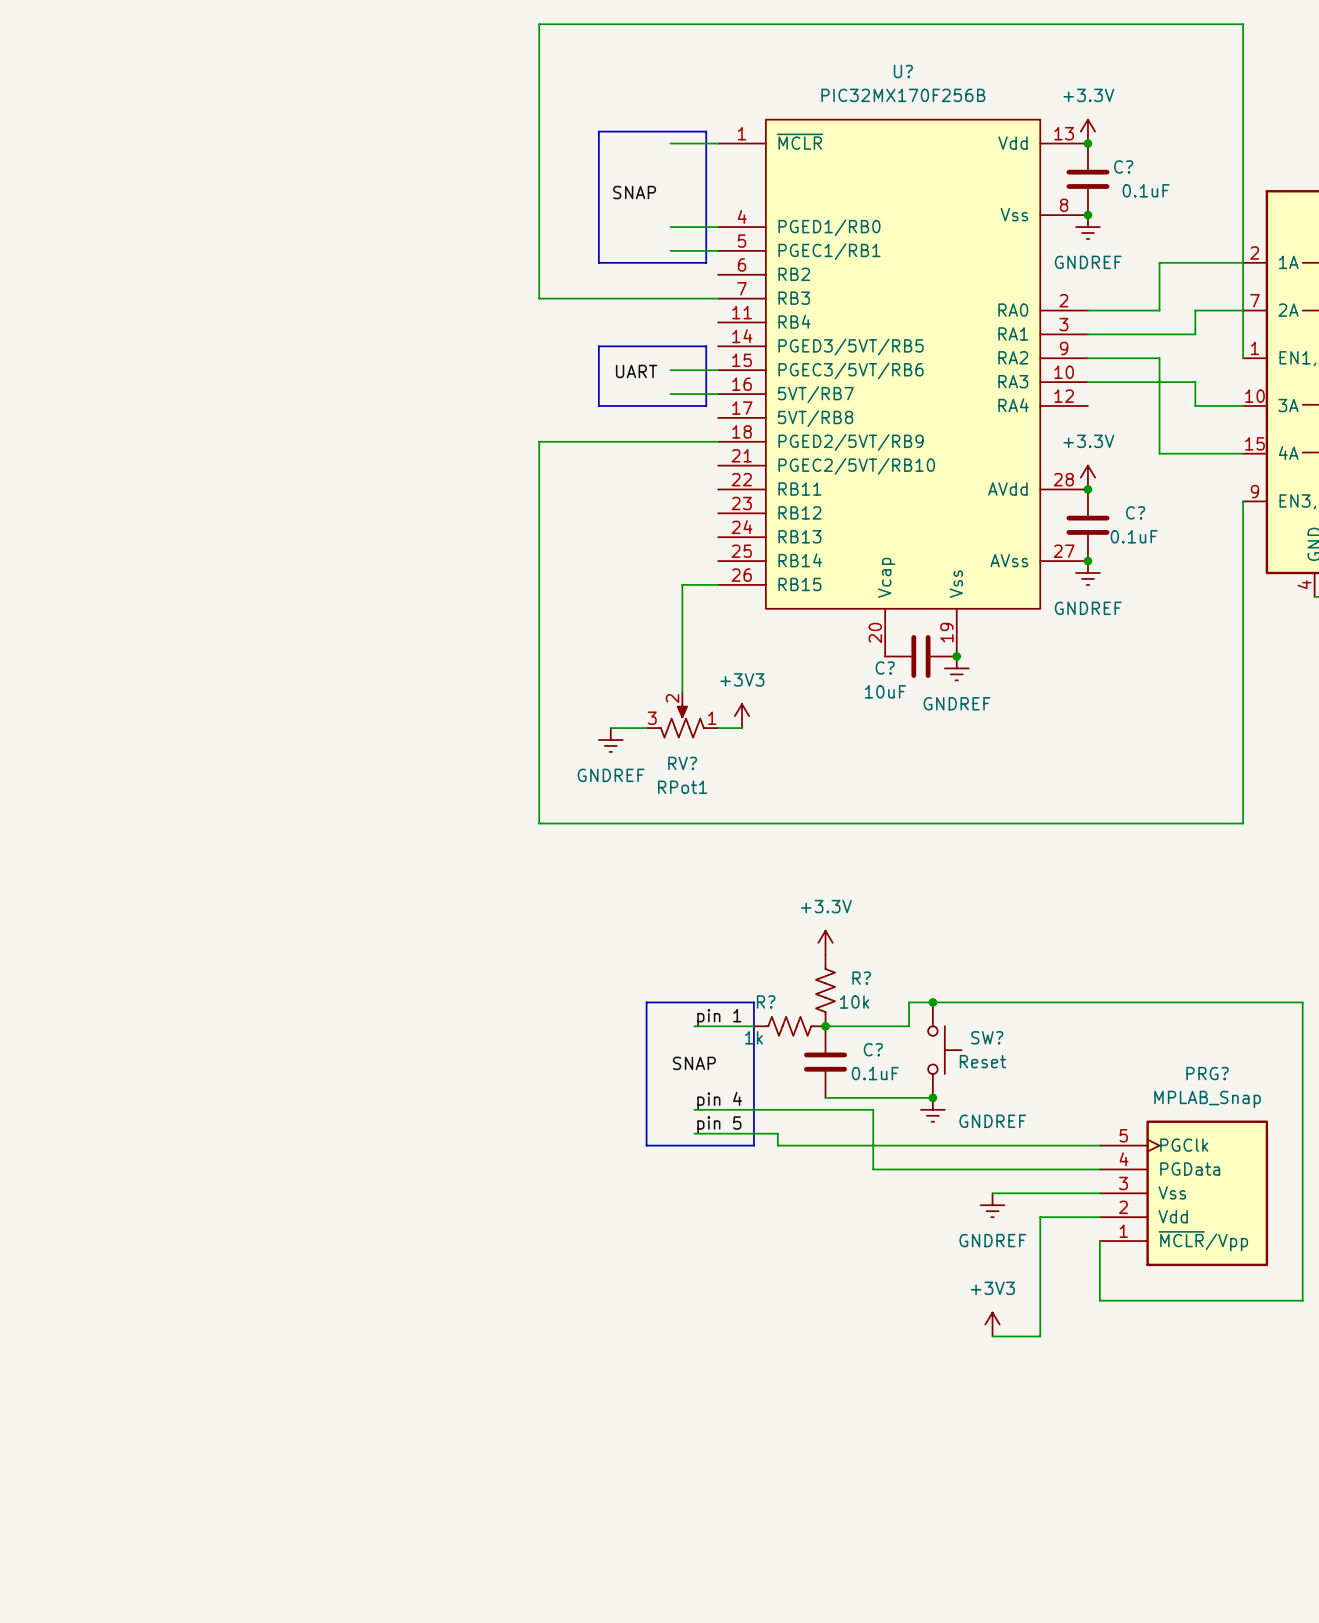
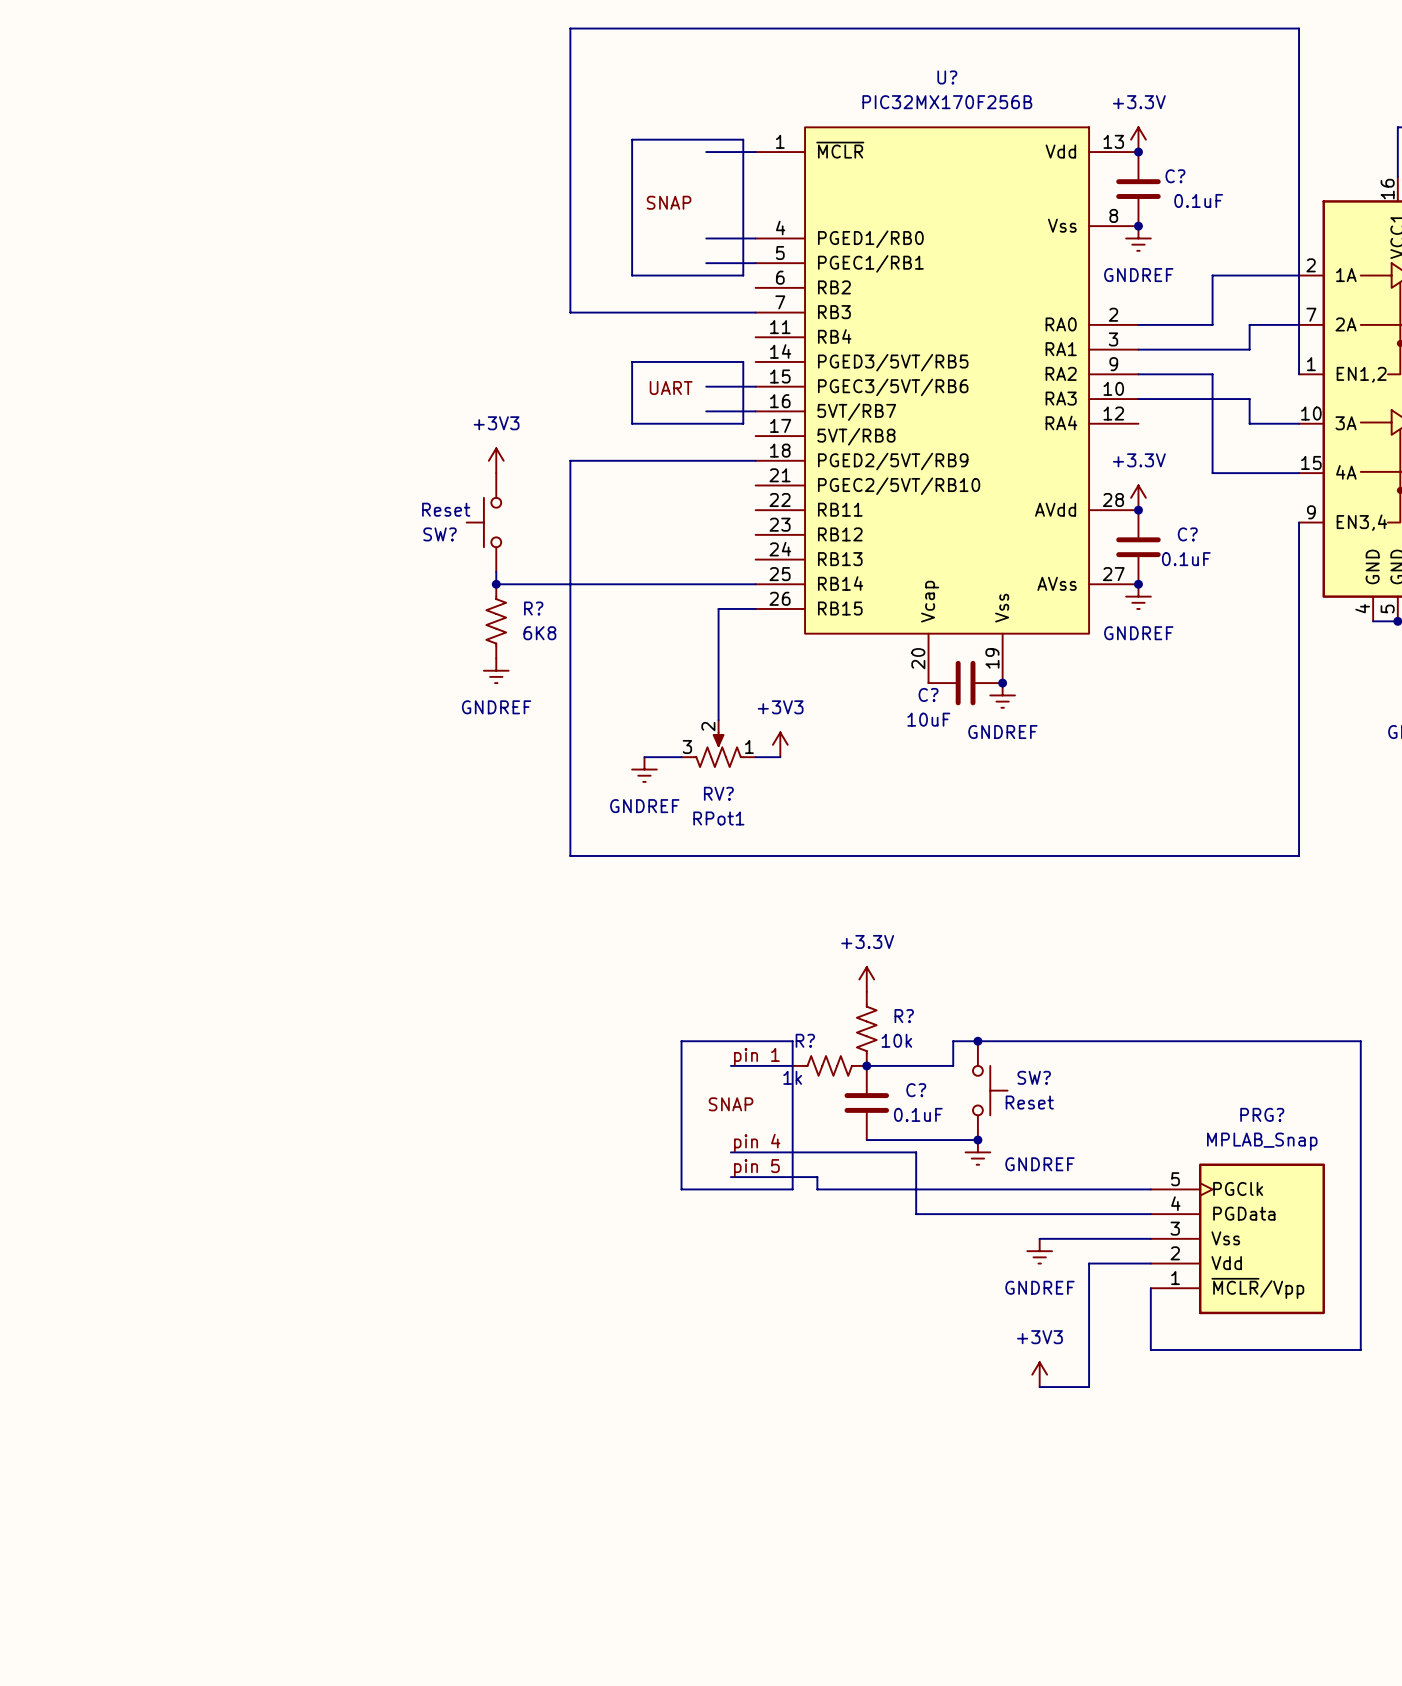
power symbol: none -> +3V3 (496, 460)
SW?: none -> Reset (483, 522)
wire: none -> (496, 571) (496, 584) (755, 584)
junction: none -> (496, 584)
R?: none -> 6K8 (496, 621)
power symbol: none -> GNDREF (496, 670)

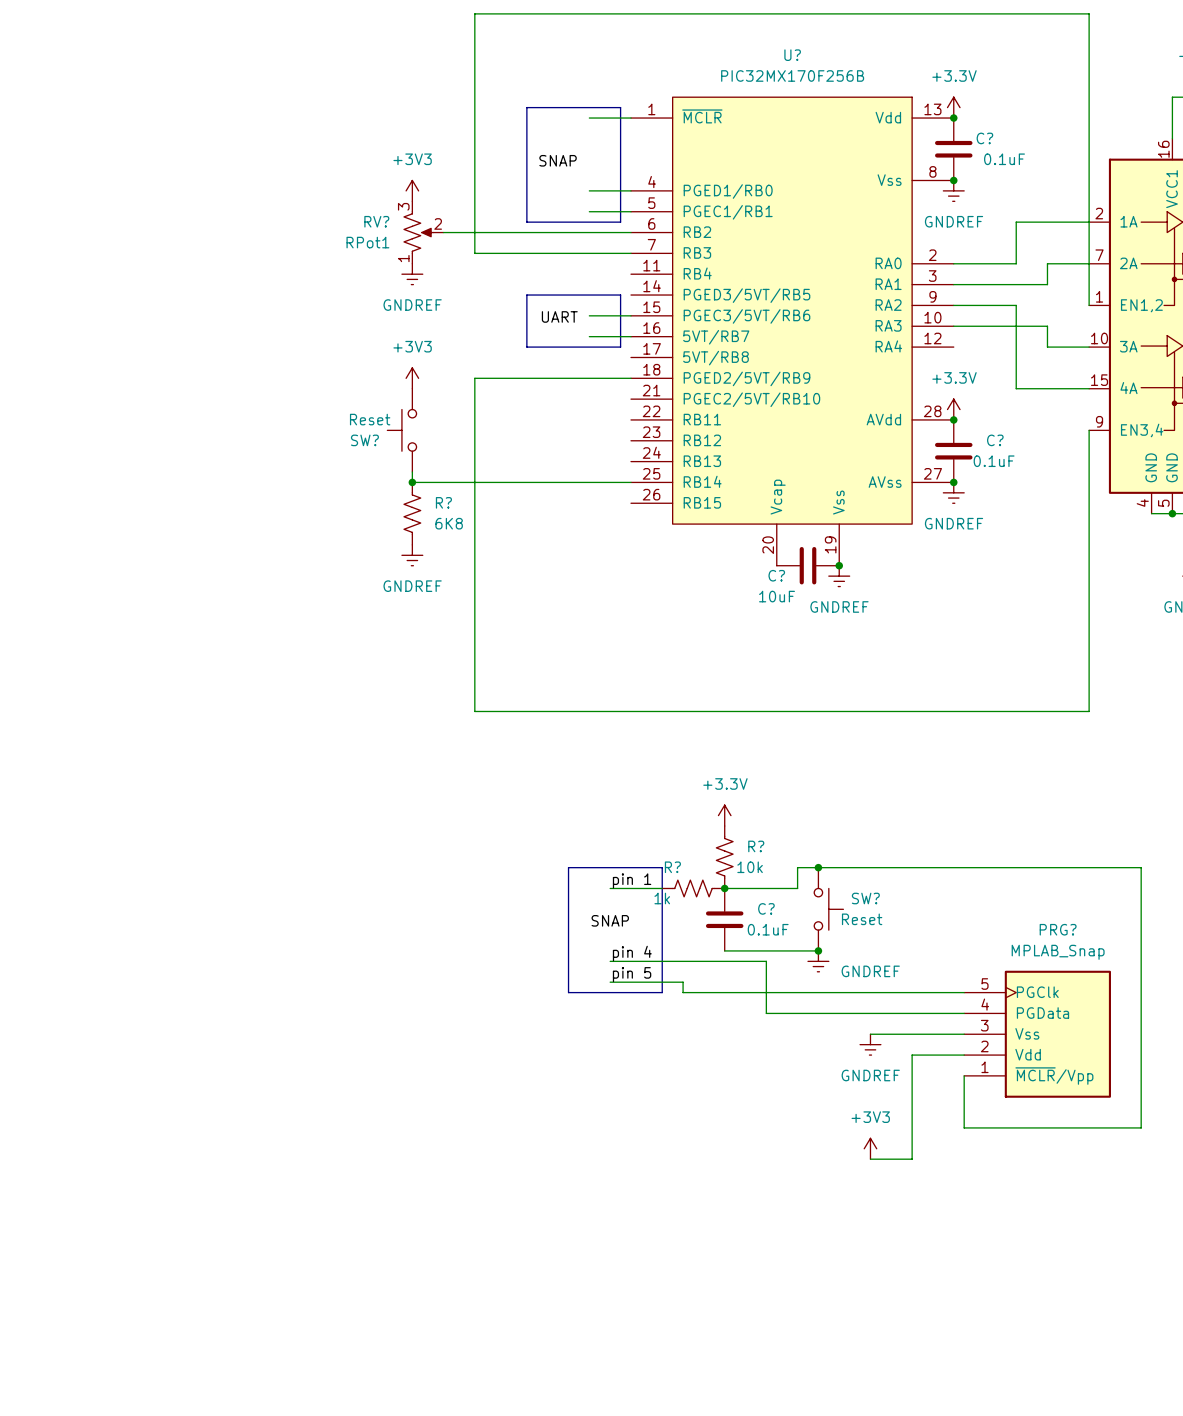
power symbol: none -> +3V3 (412, 190)
RV?: none -> RPot1 (423, 232)
wire: none -> (443, 232) (631, 232)
power symbol: none -> GNDREF (412, 274)
wire: (755, 608) (718, 608) (718, 720) -> none
RV?: RPot1 (718, 743) -> none
power symbol: +3V3 (780, 744) -> none
wire: (644, 757) (681, 757) -> none
wire: (755, 757) (780, 757) -> none
power symbol: GNDREF (644, 769) -> none

